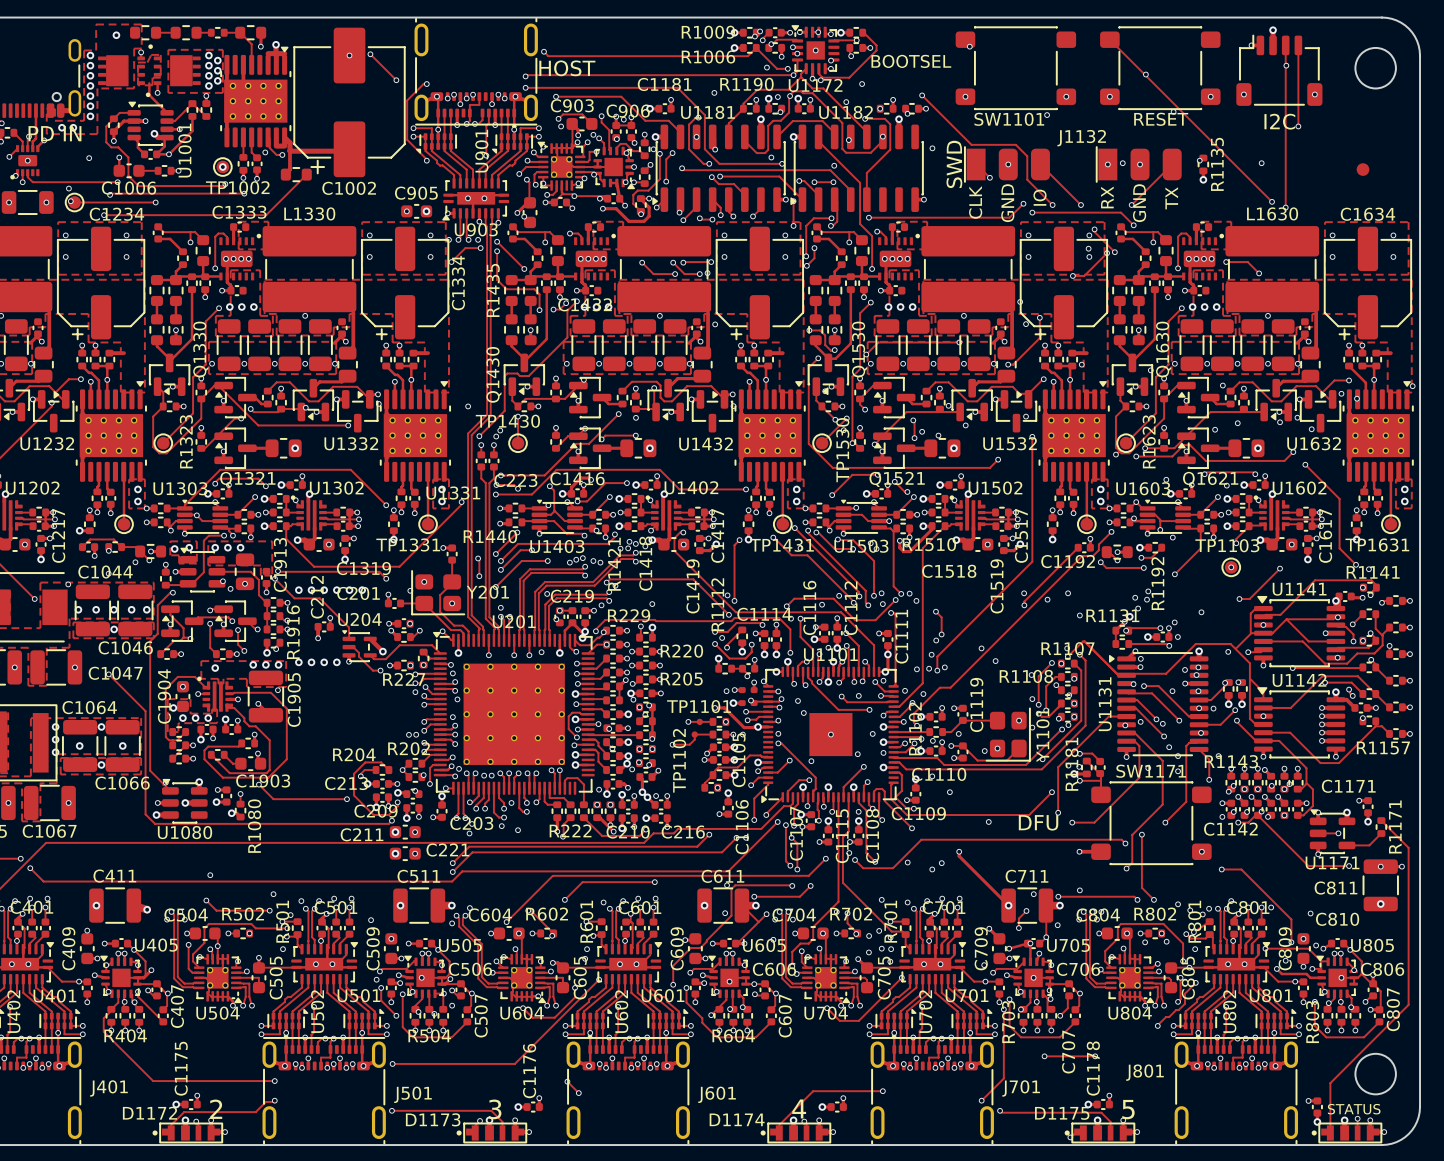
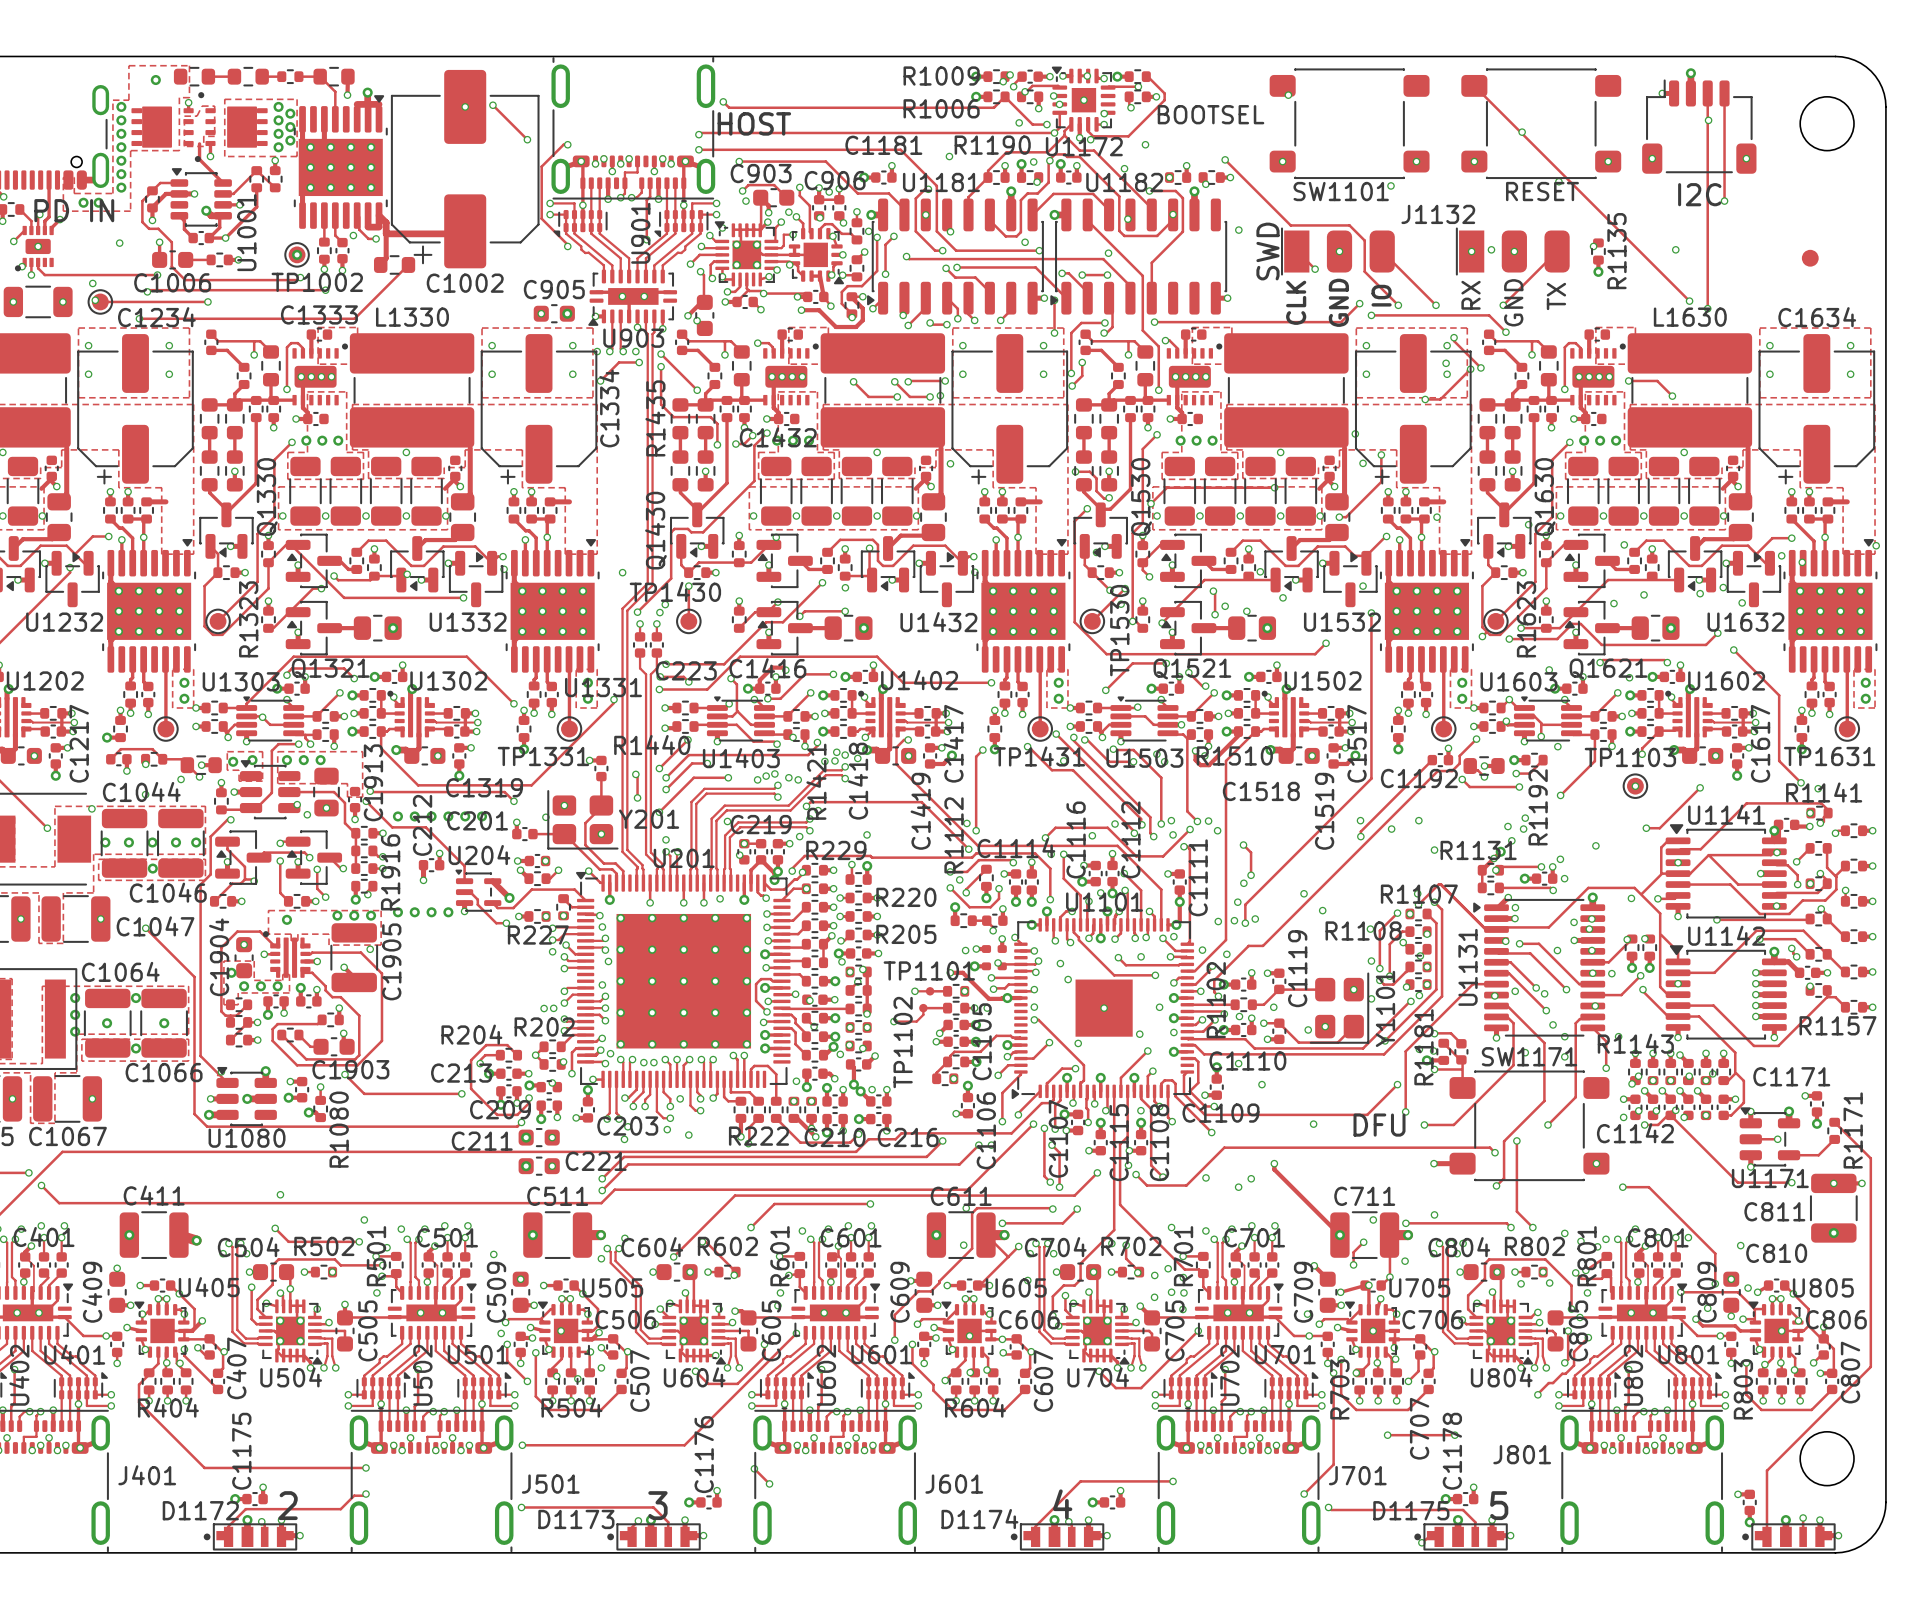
text: STATUS (1354, 1109) -> none

